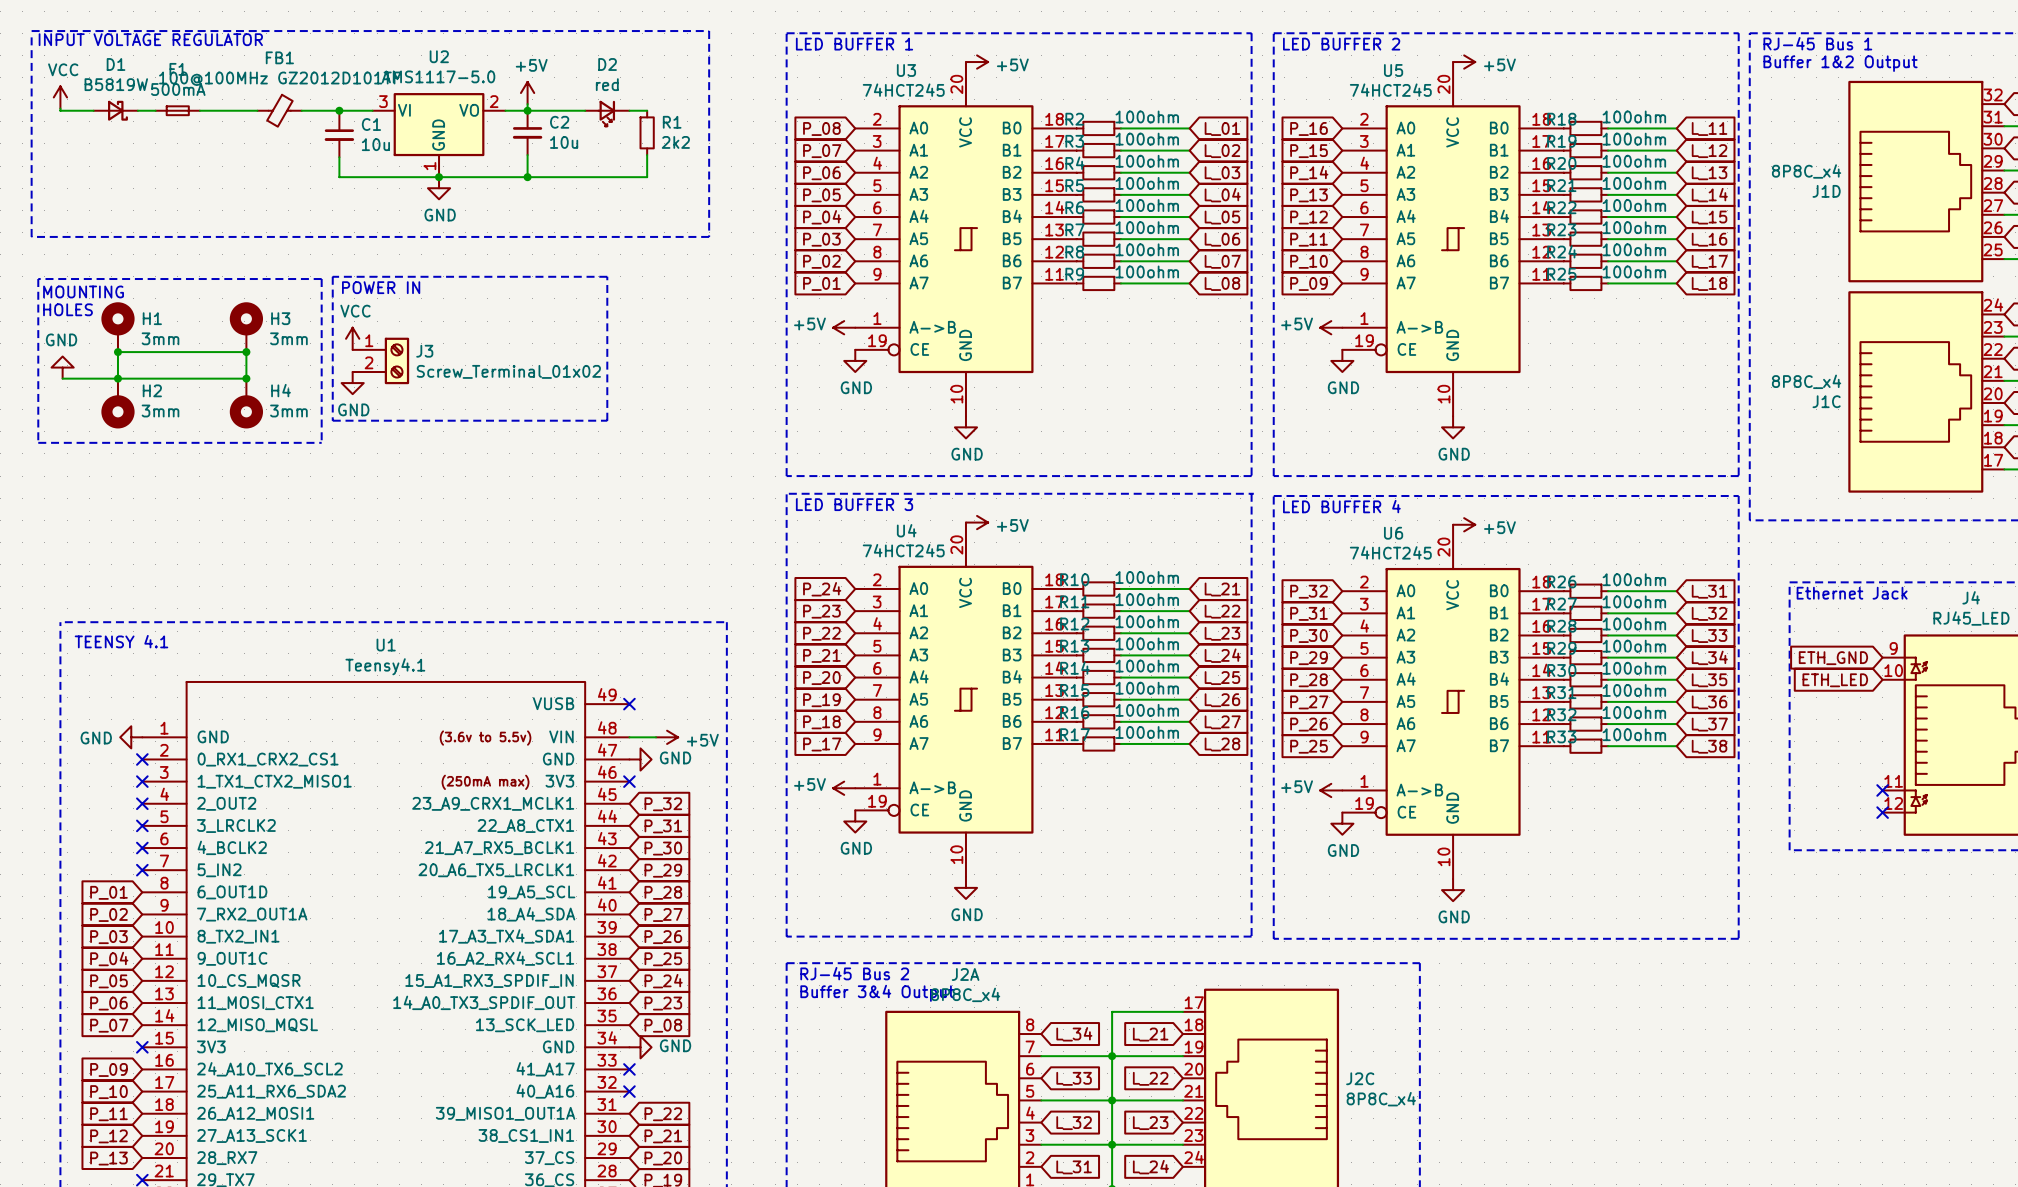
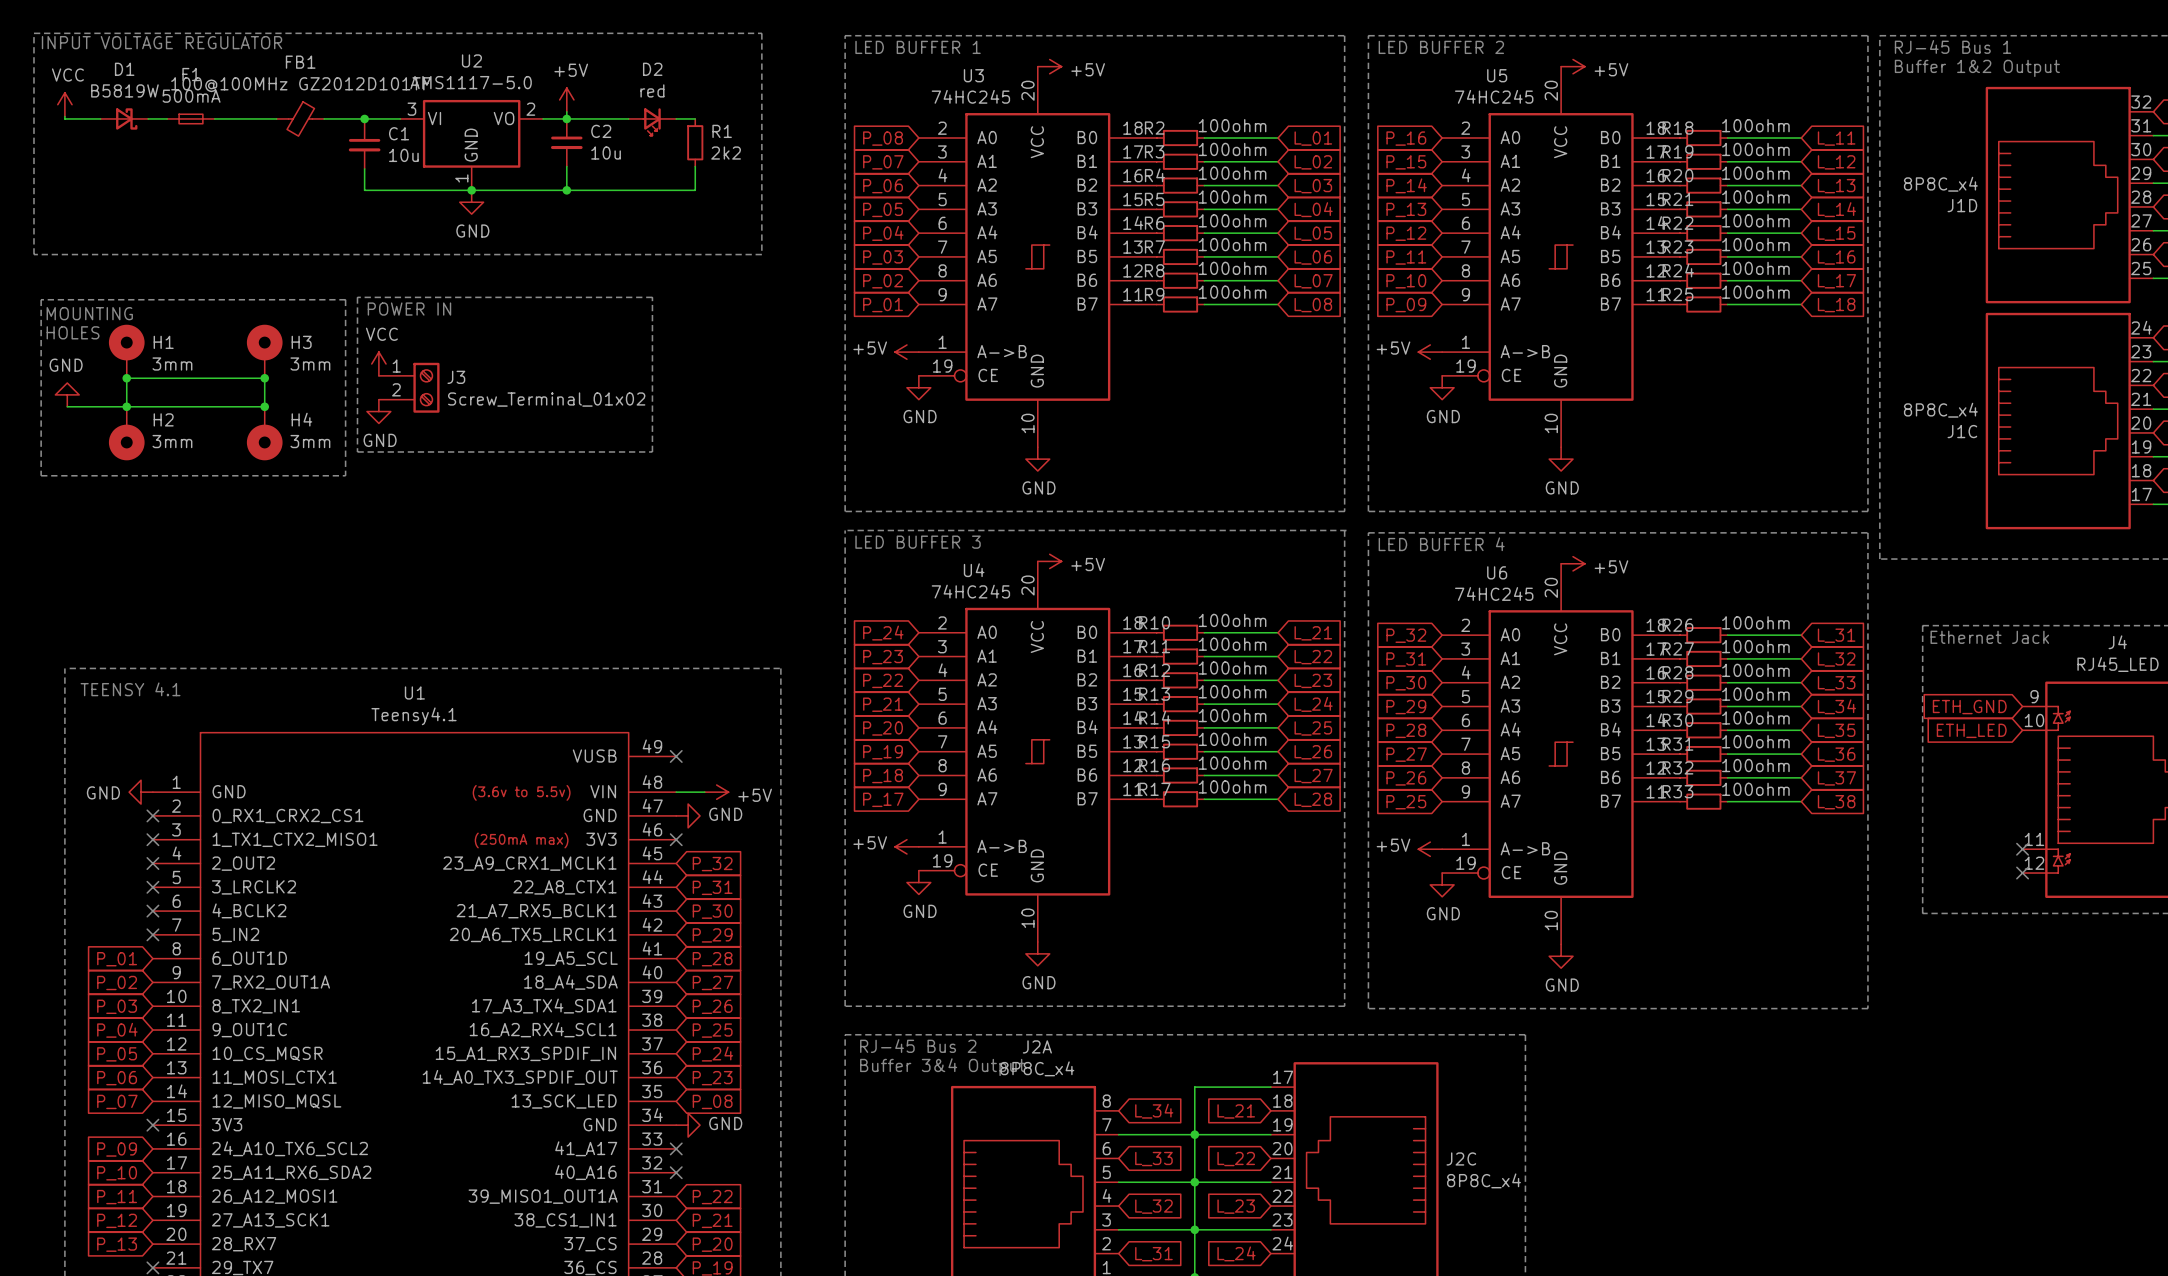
U3 value: 74HCT245 (903, 90) -> 74HC245 (970, 96)
U5 value: 74HCT245 (1390, 90) -> 74HC245 (1494, 96)
U4 value: 74HCT245 (903, 550) -> 74HC245 (970, 591)
U6 value: 74HCT245 (1390, 552) -> 74HC245 (1494, 593)

